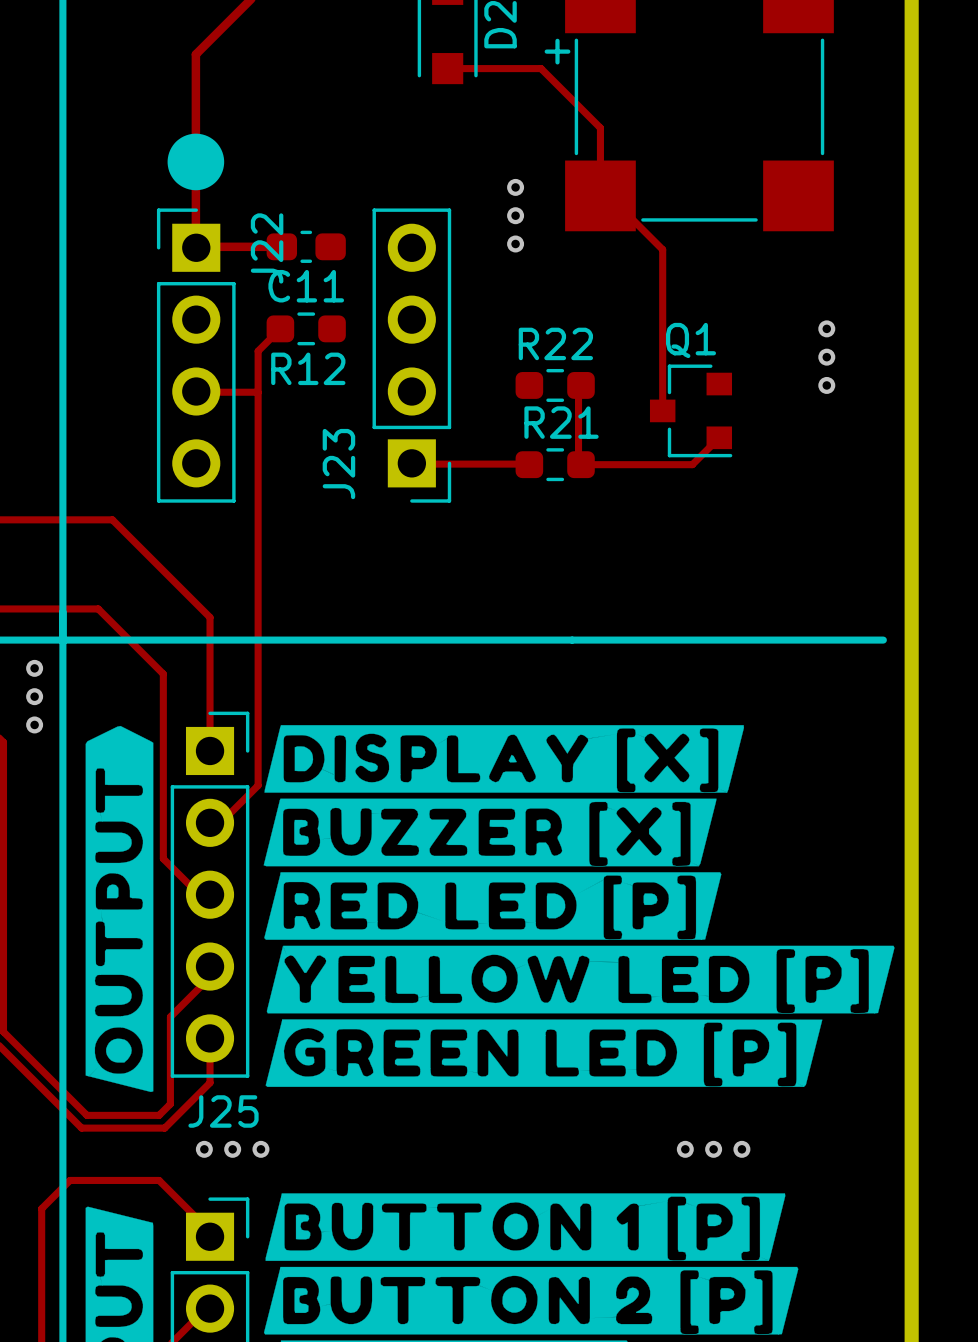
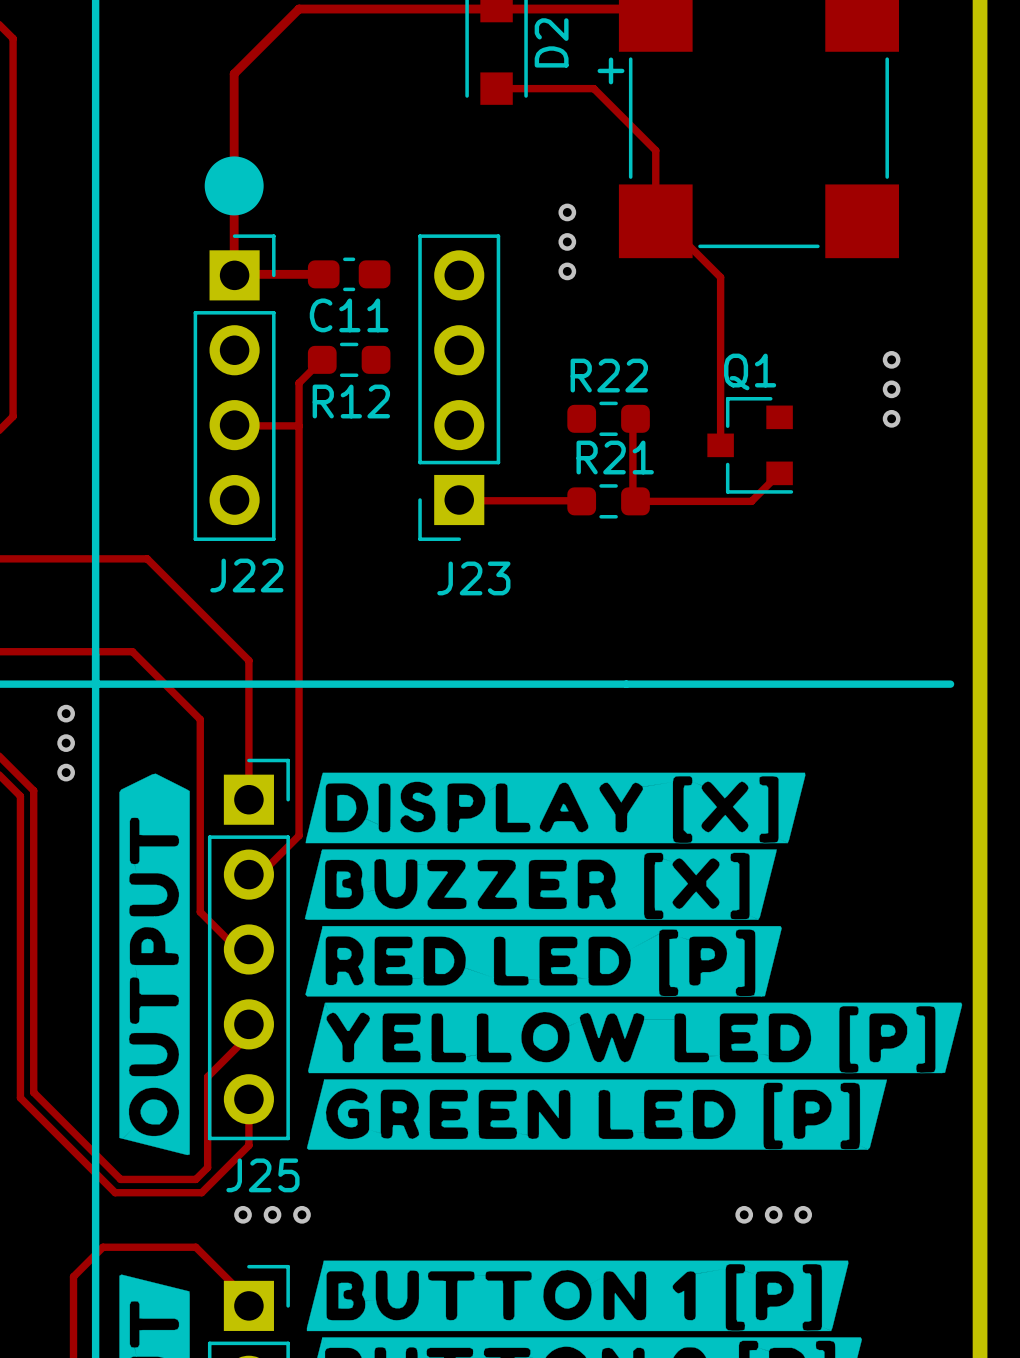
J22 footprint: [156, 208, 236, 503] -> [193, 234, 276, 541]
J23 footprint: [372, 208, 452, 503] -> [418, 234, 501, 541]
J22 name position: J22 (267, 248) -> J22 (246, 575)
J23 name position: J23 (338, 464) -> J23 (473, 578)

